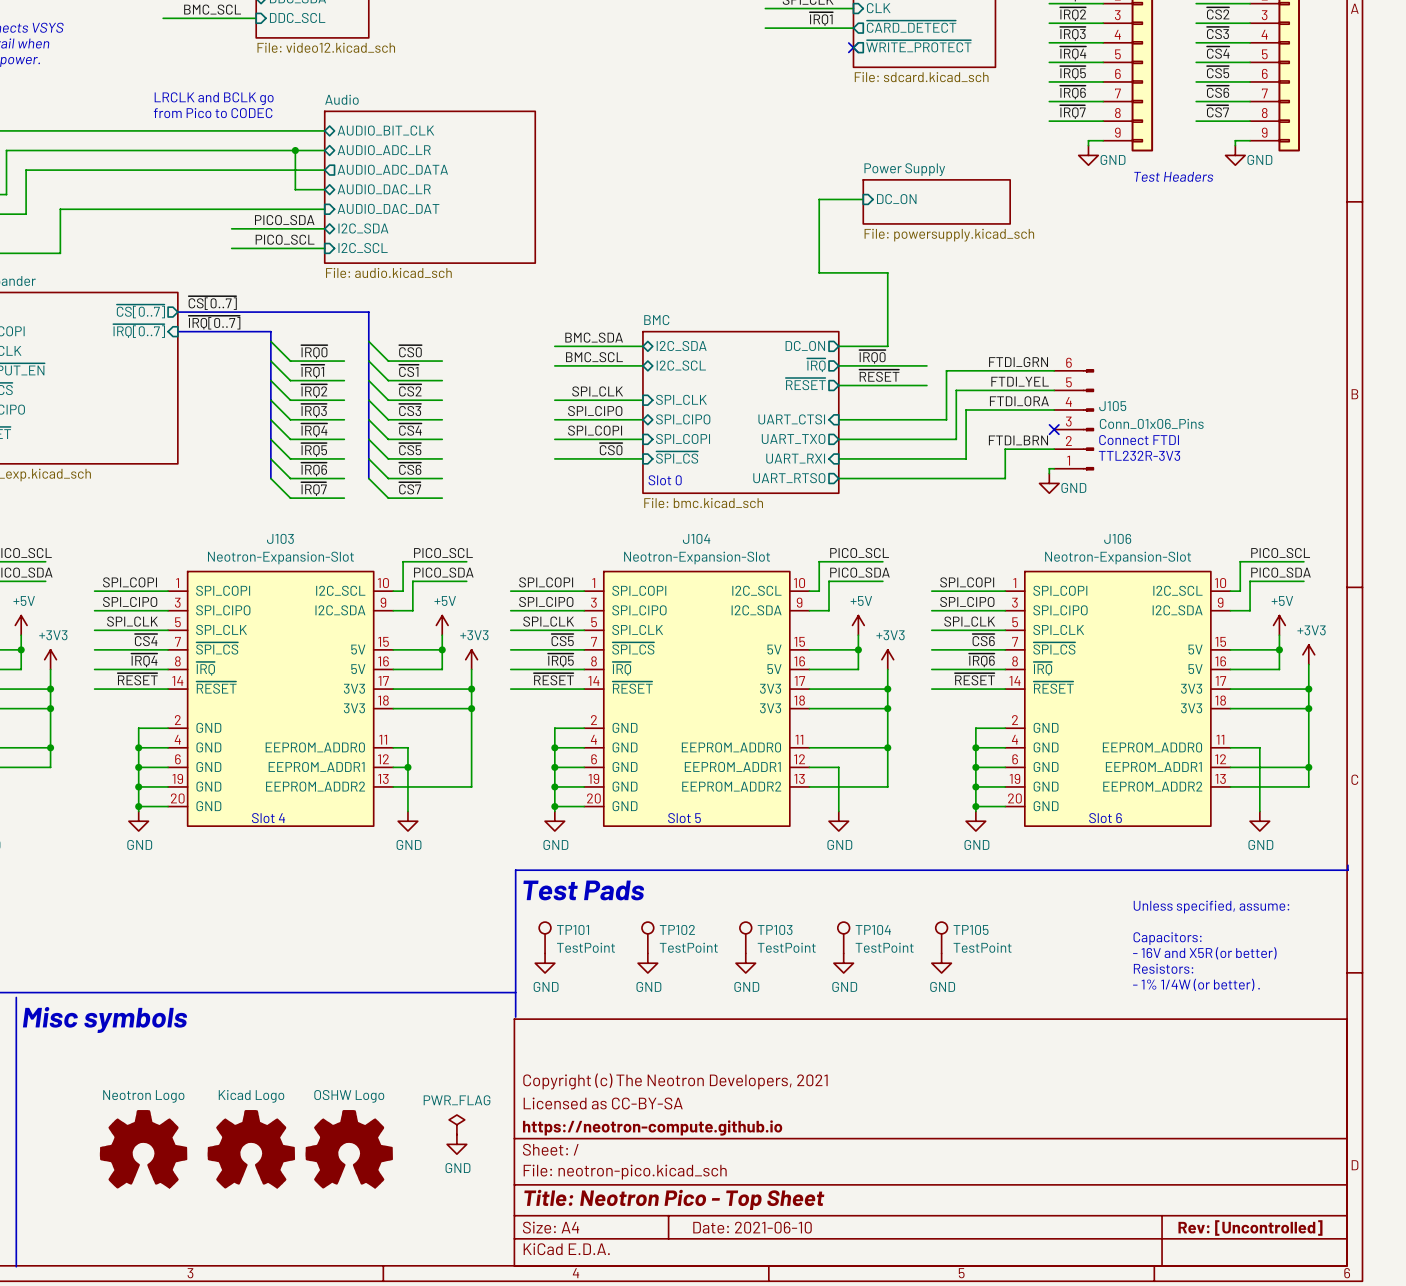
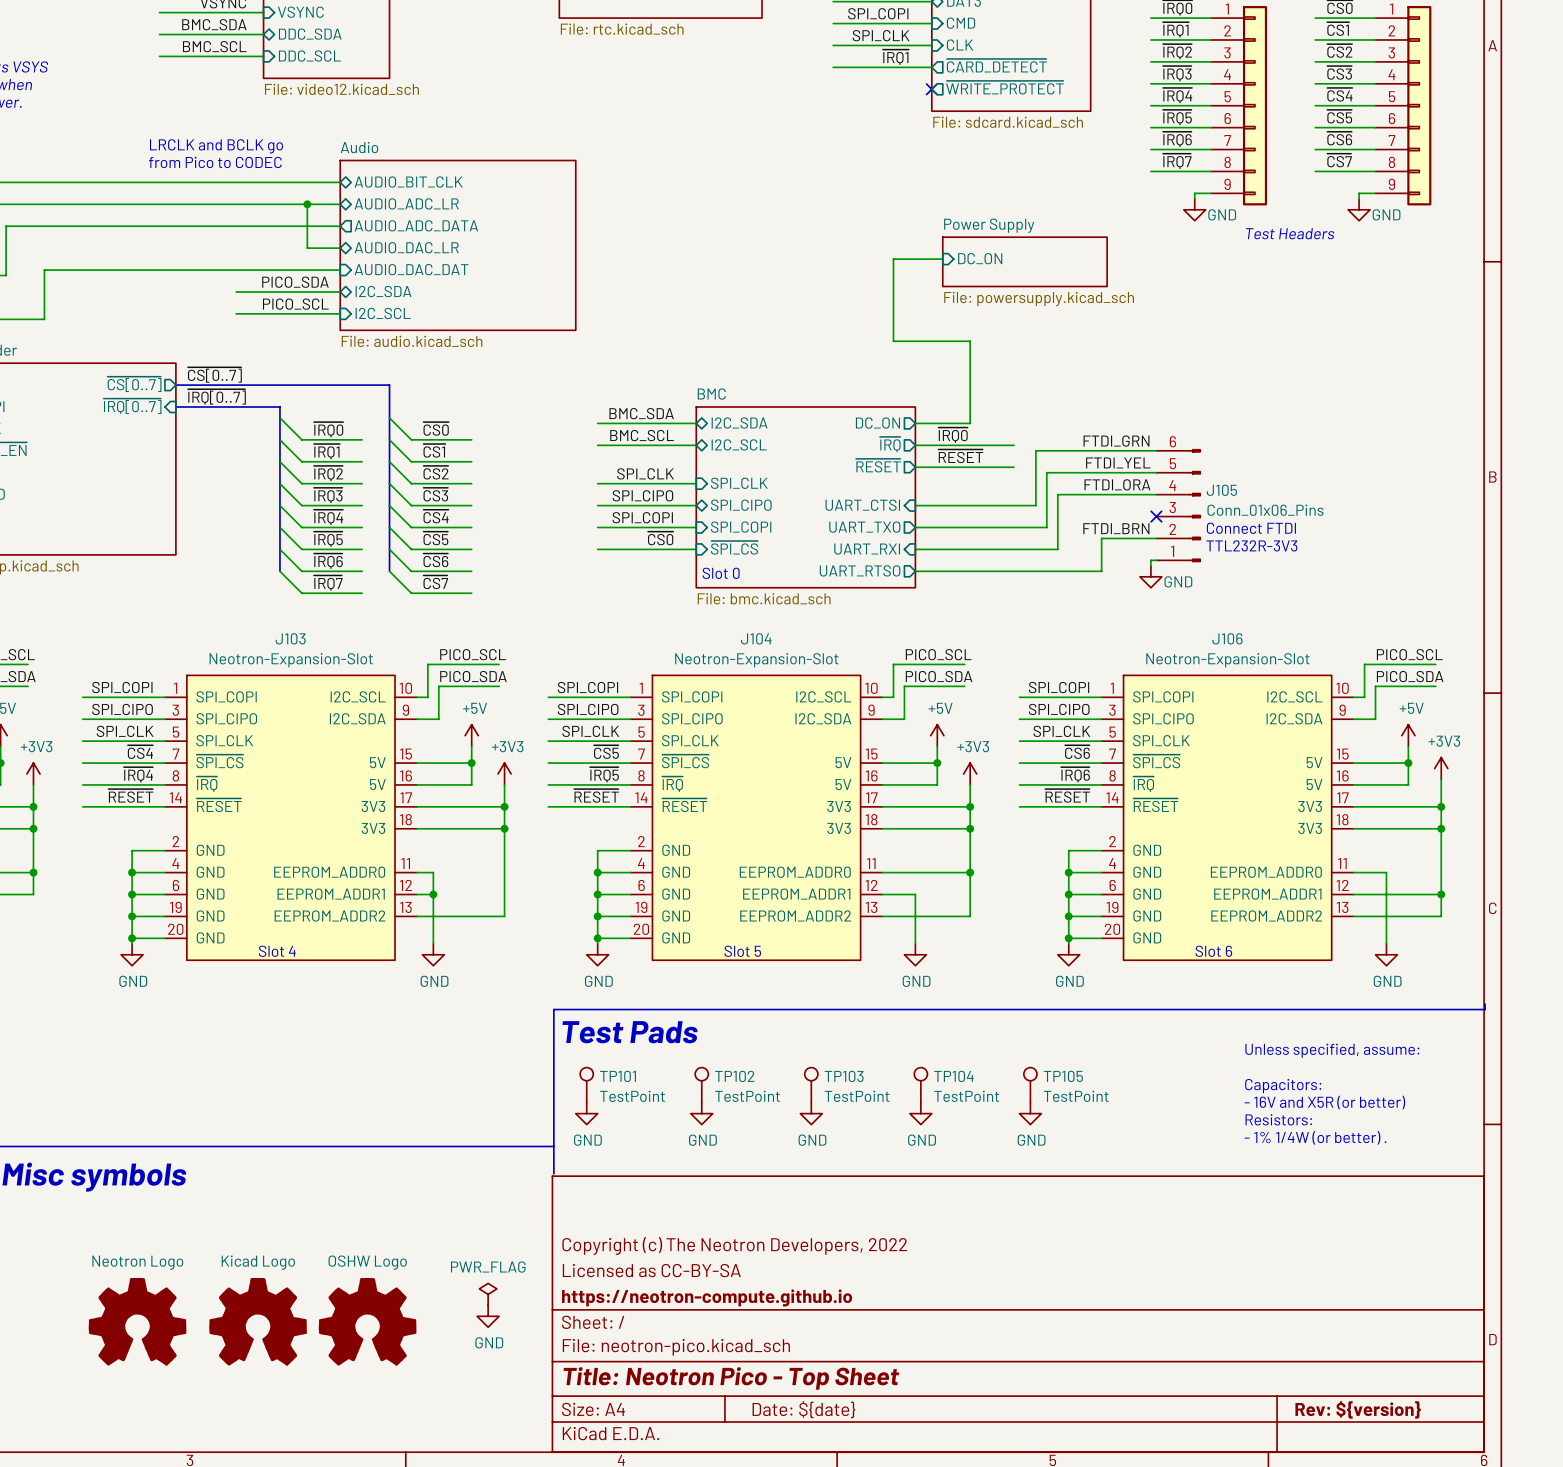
title block: Copyright (c) The Neotron Developers, 2021 (675, 1081) -> Copyright (c) The Neotron Developers, 2022 (734, 1245)
title block: Date: 2021-06-10 (752, 1227) -> Date: ${date} (803, 1409)
title block: Rev: [Uncontrolled] (1250, 1228) -> Rev: ${version} (1358, 1409)

